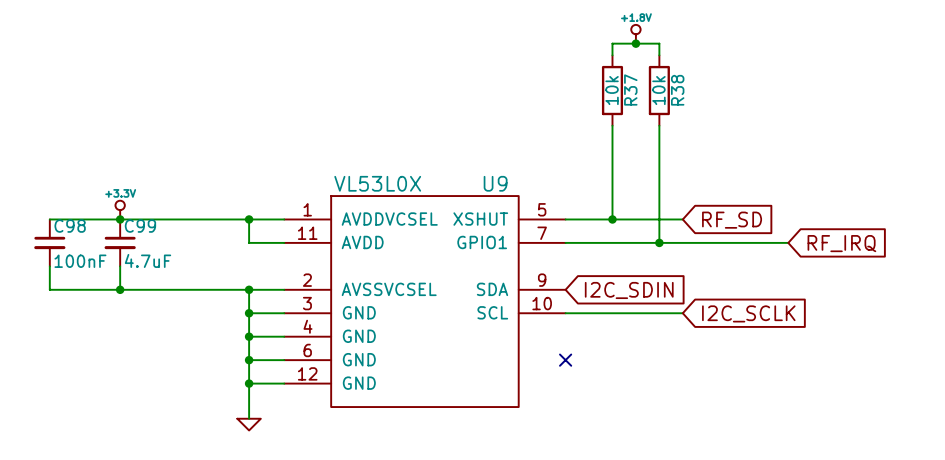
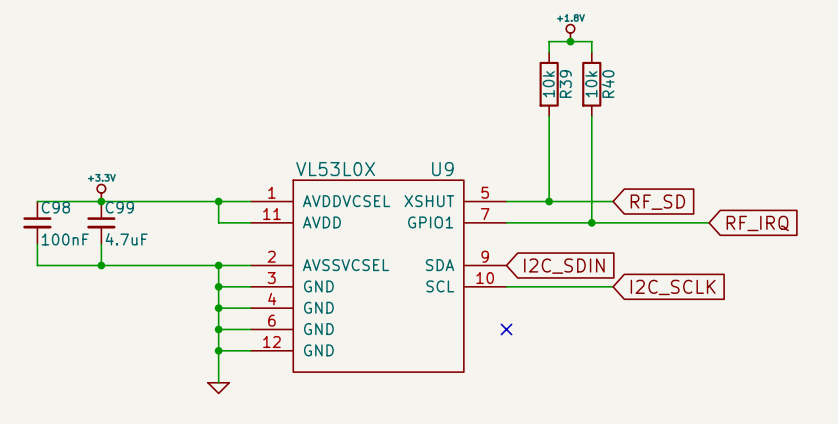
R37 name: R37 (630, 89) -> R39 (565, 84)
R38 name: R38 (677, 90) -> R40 (608, 84)

